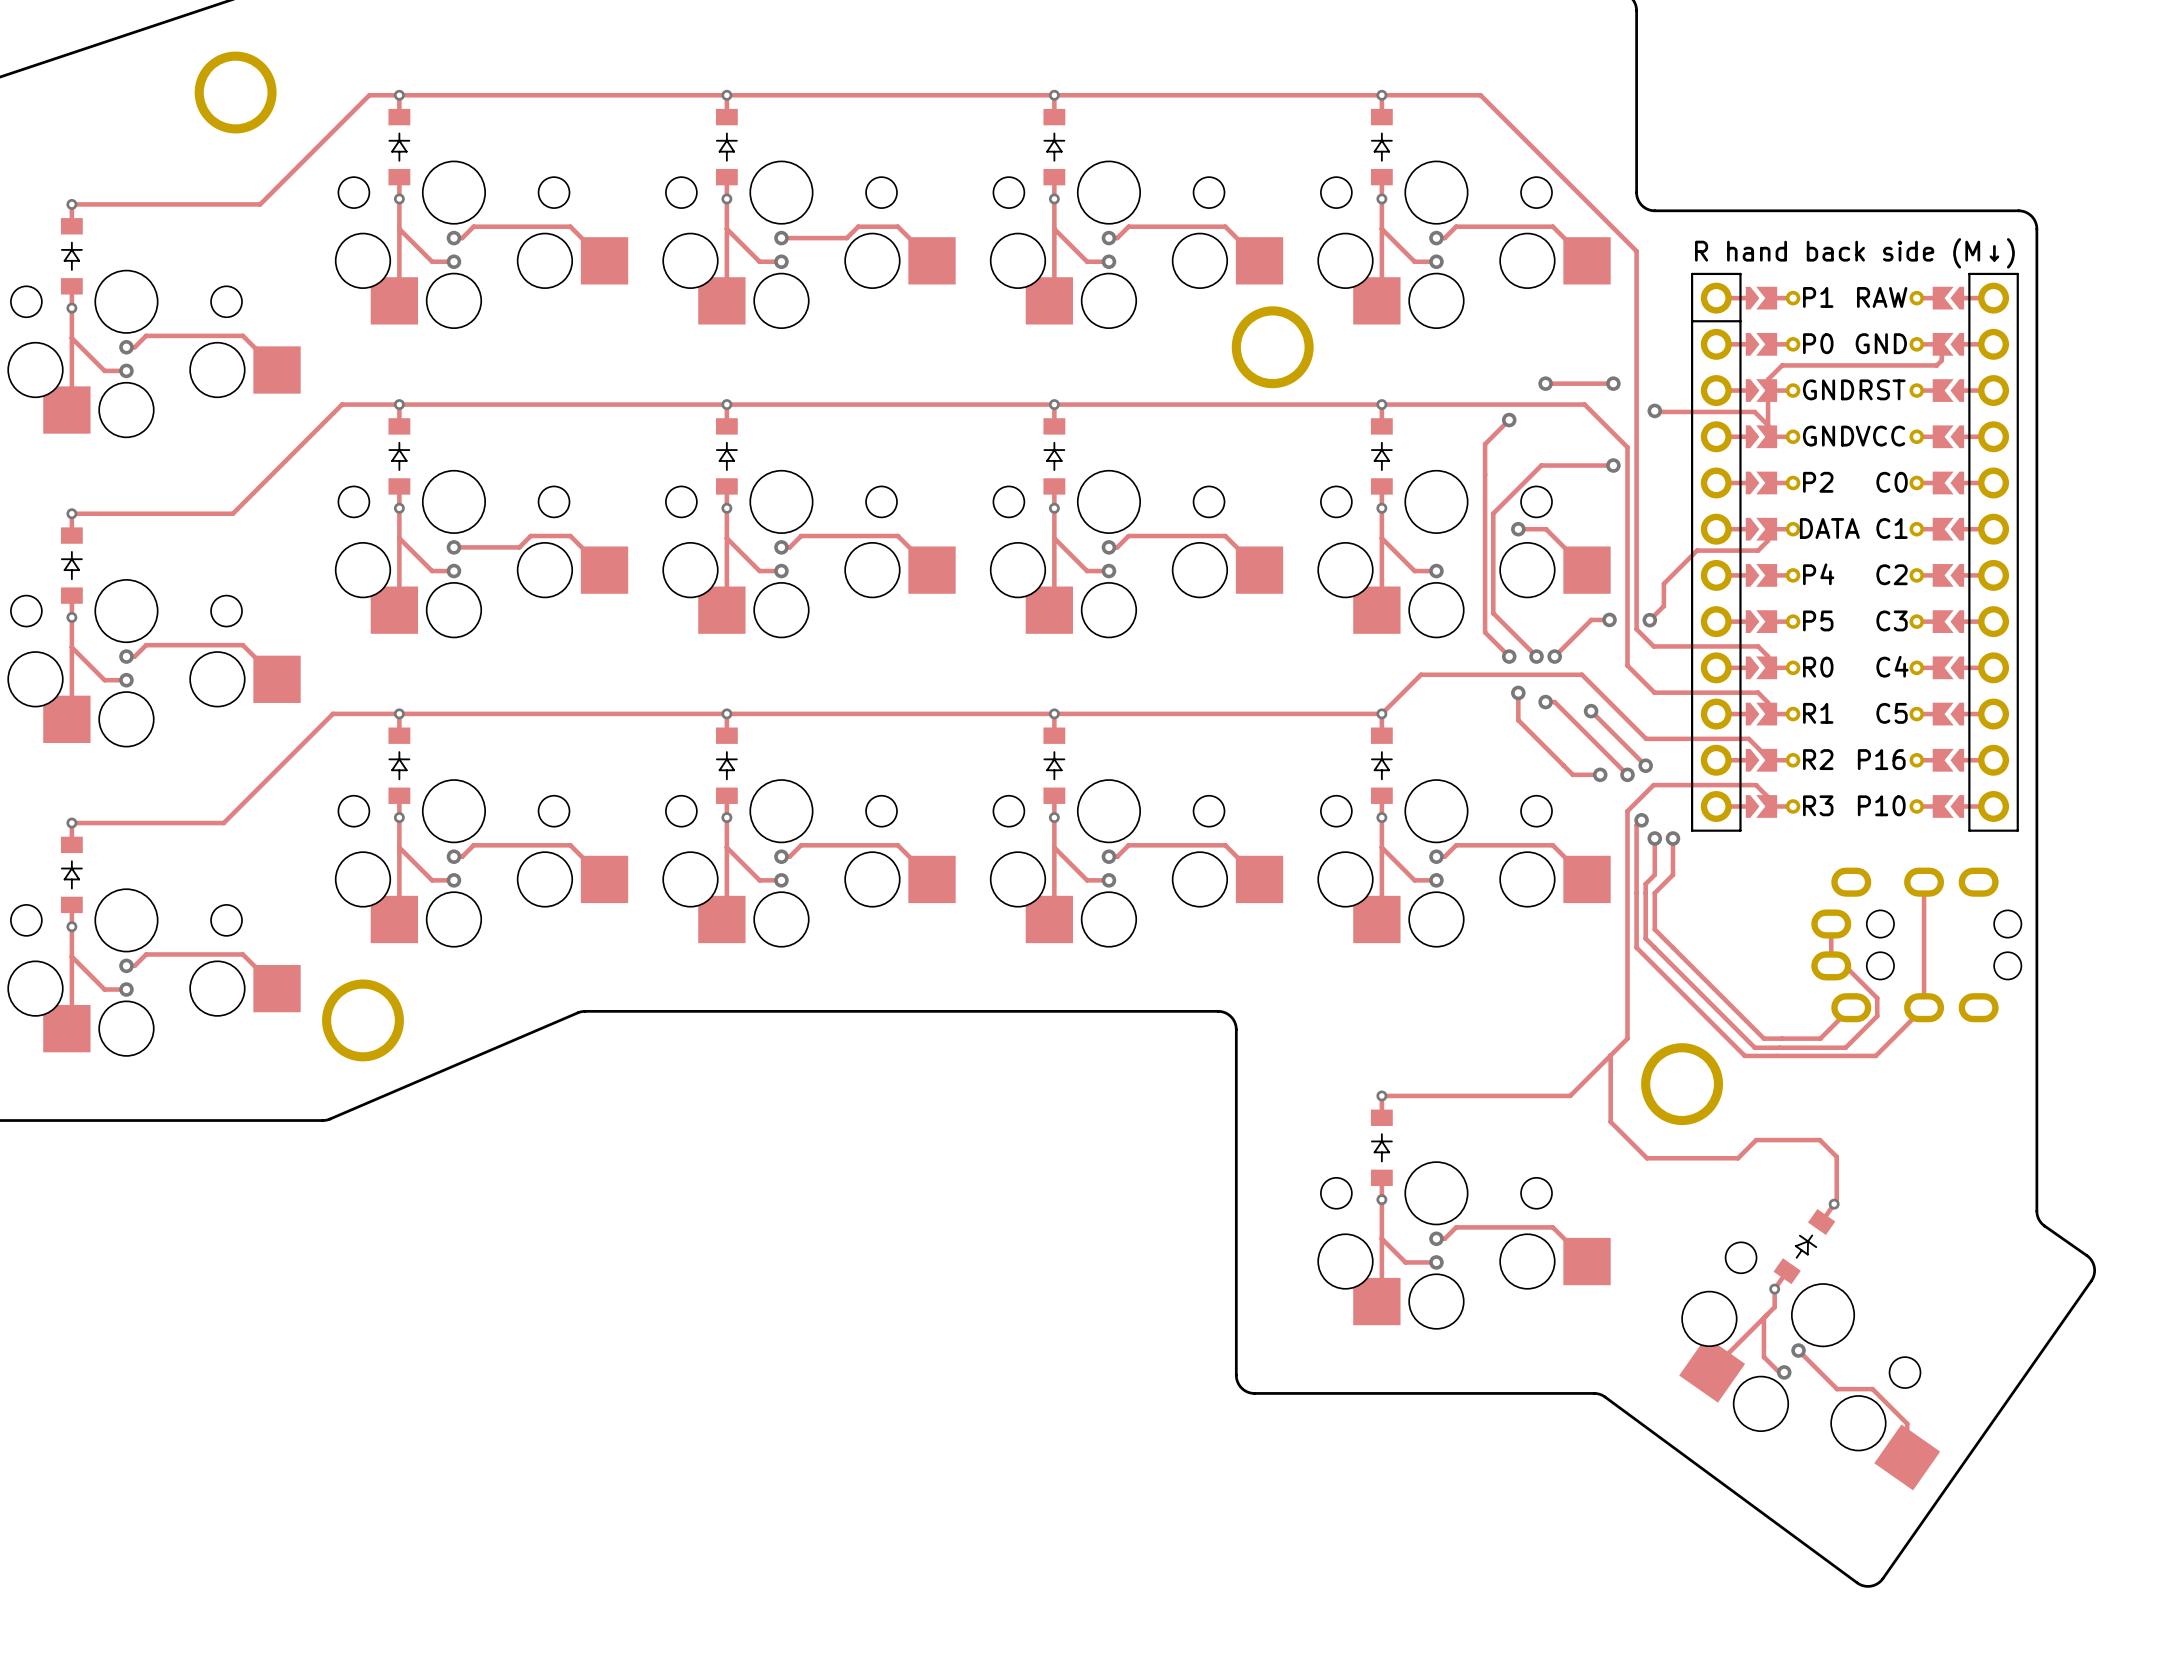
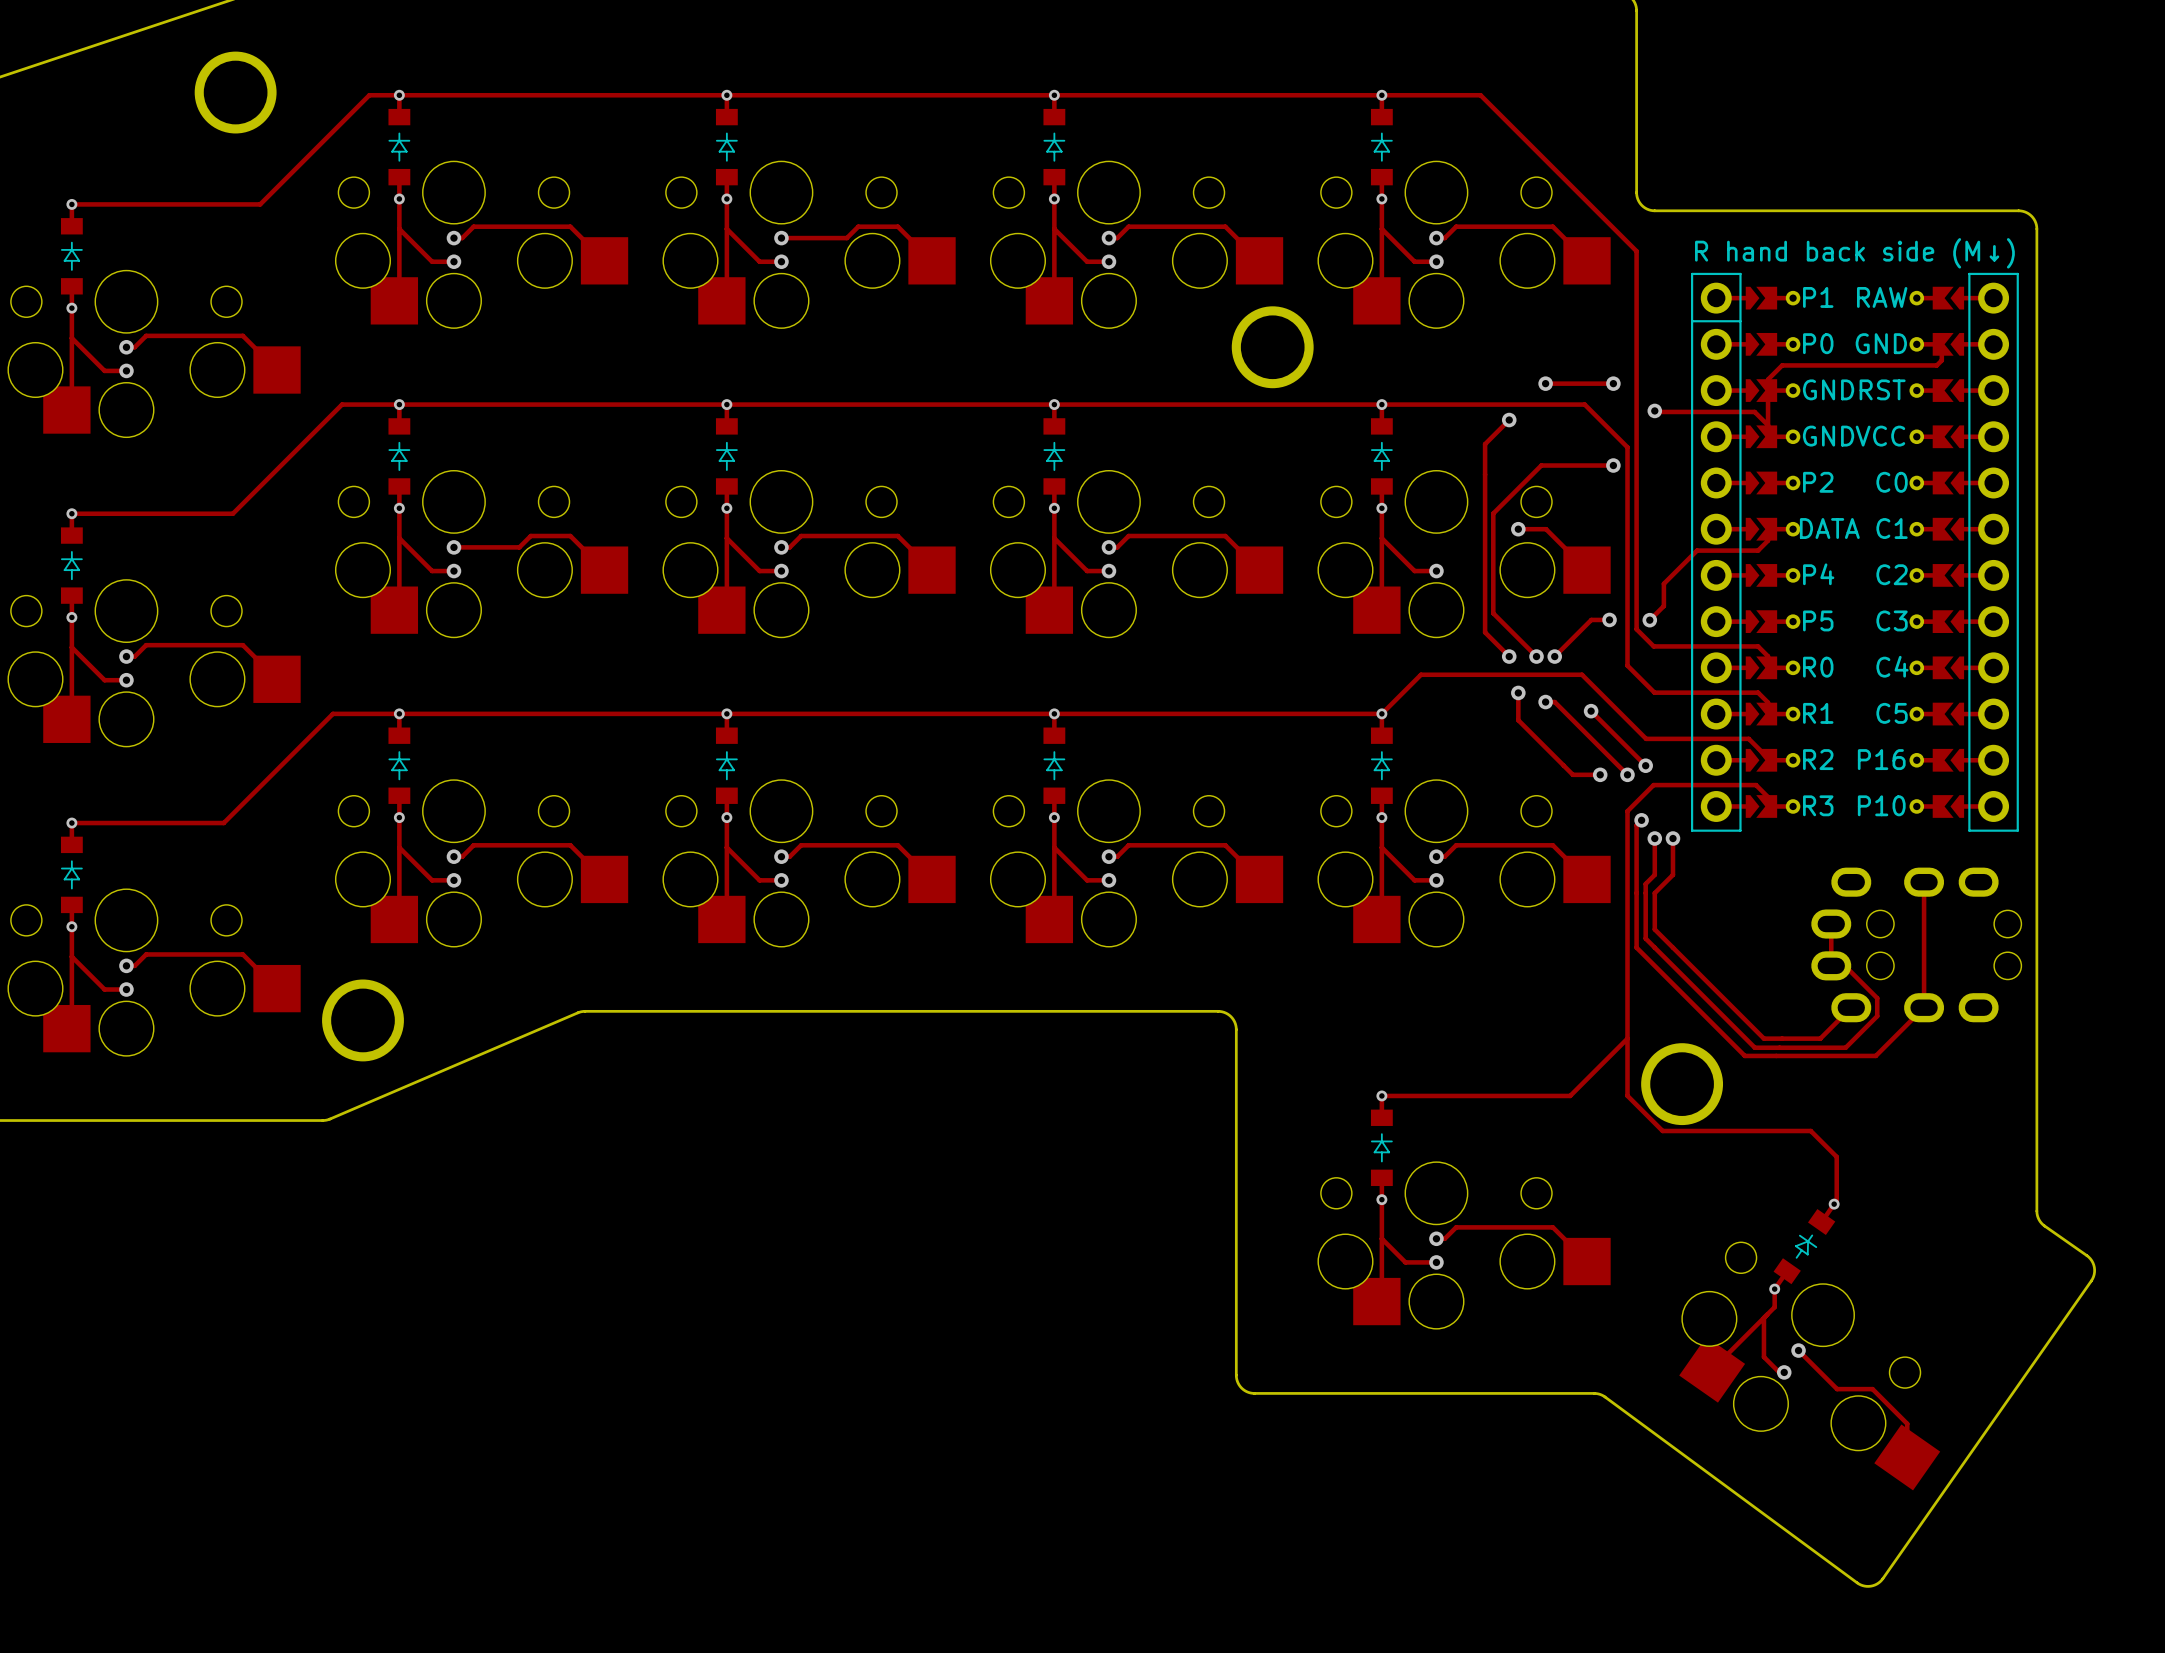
track: (1610, 1055) (1610, 1121) (1647, 1158) (1738, 1158) (1756, 1140) (1819, 1140) -> (1627, 1038) (1627, 1095) (1662, 1131) (1810, 1131) (1819, 1140)

